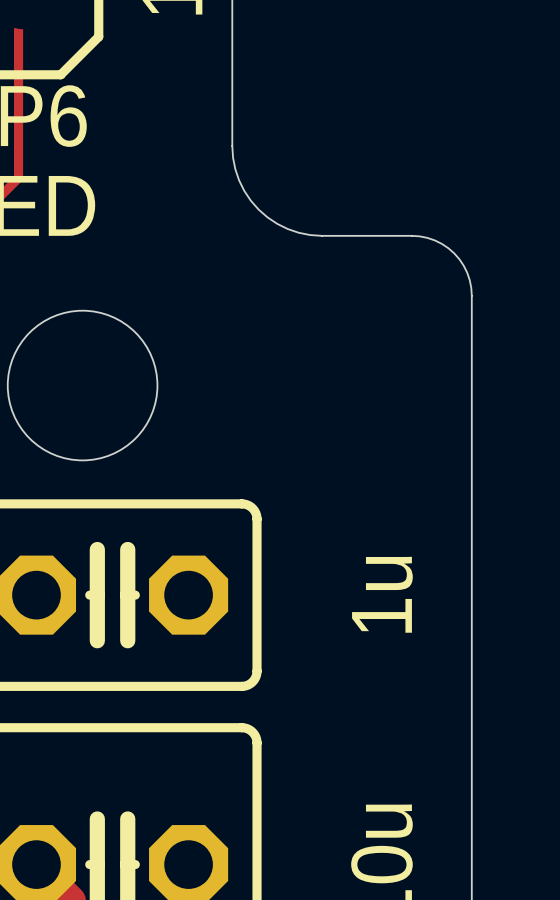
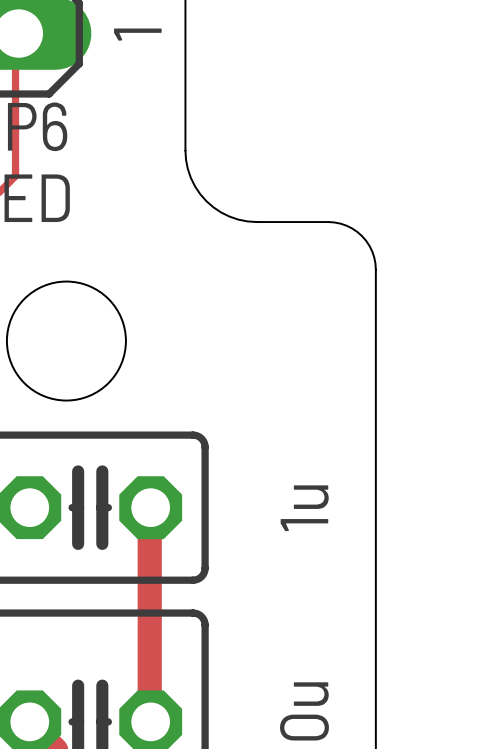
track: none -> (150, 507) (150, 721)

